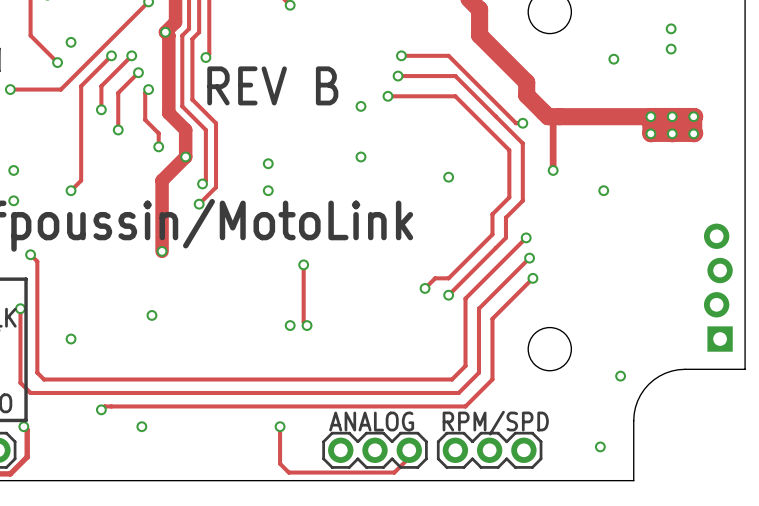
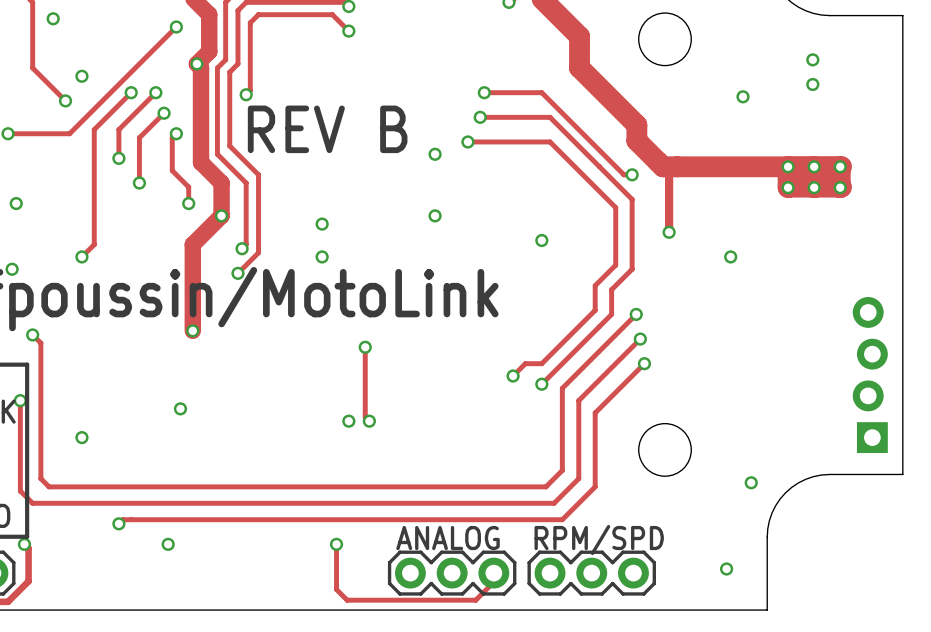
via: none -> (16, 203)
via: (13, 170) -> none

